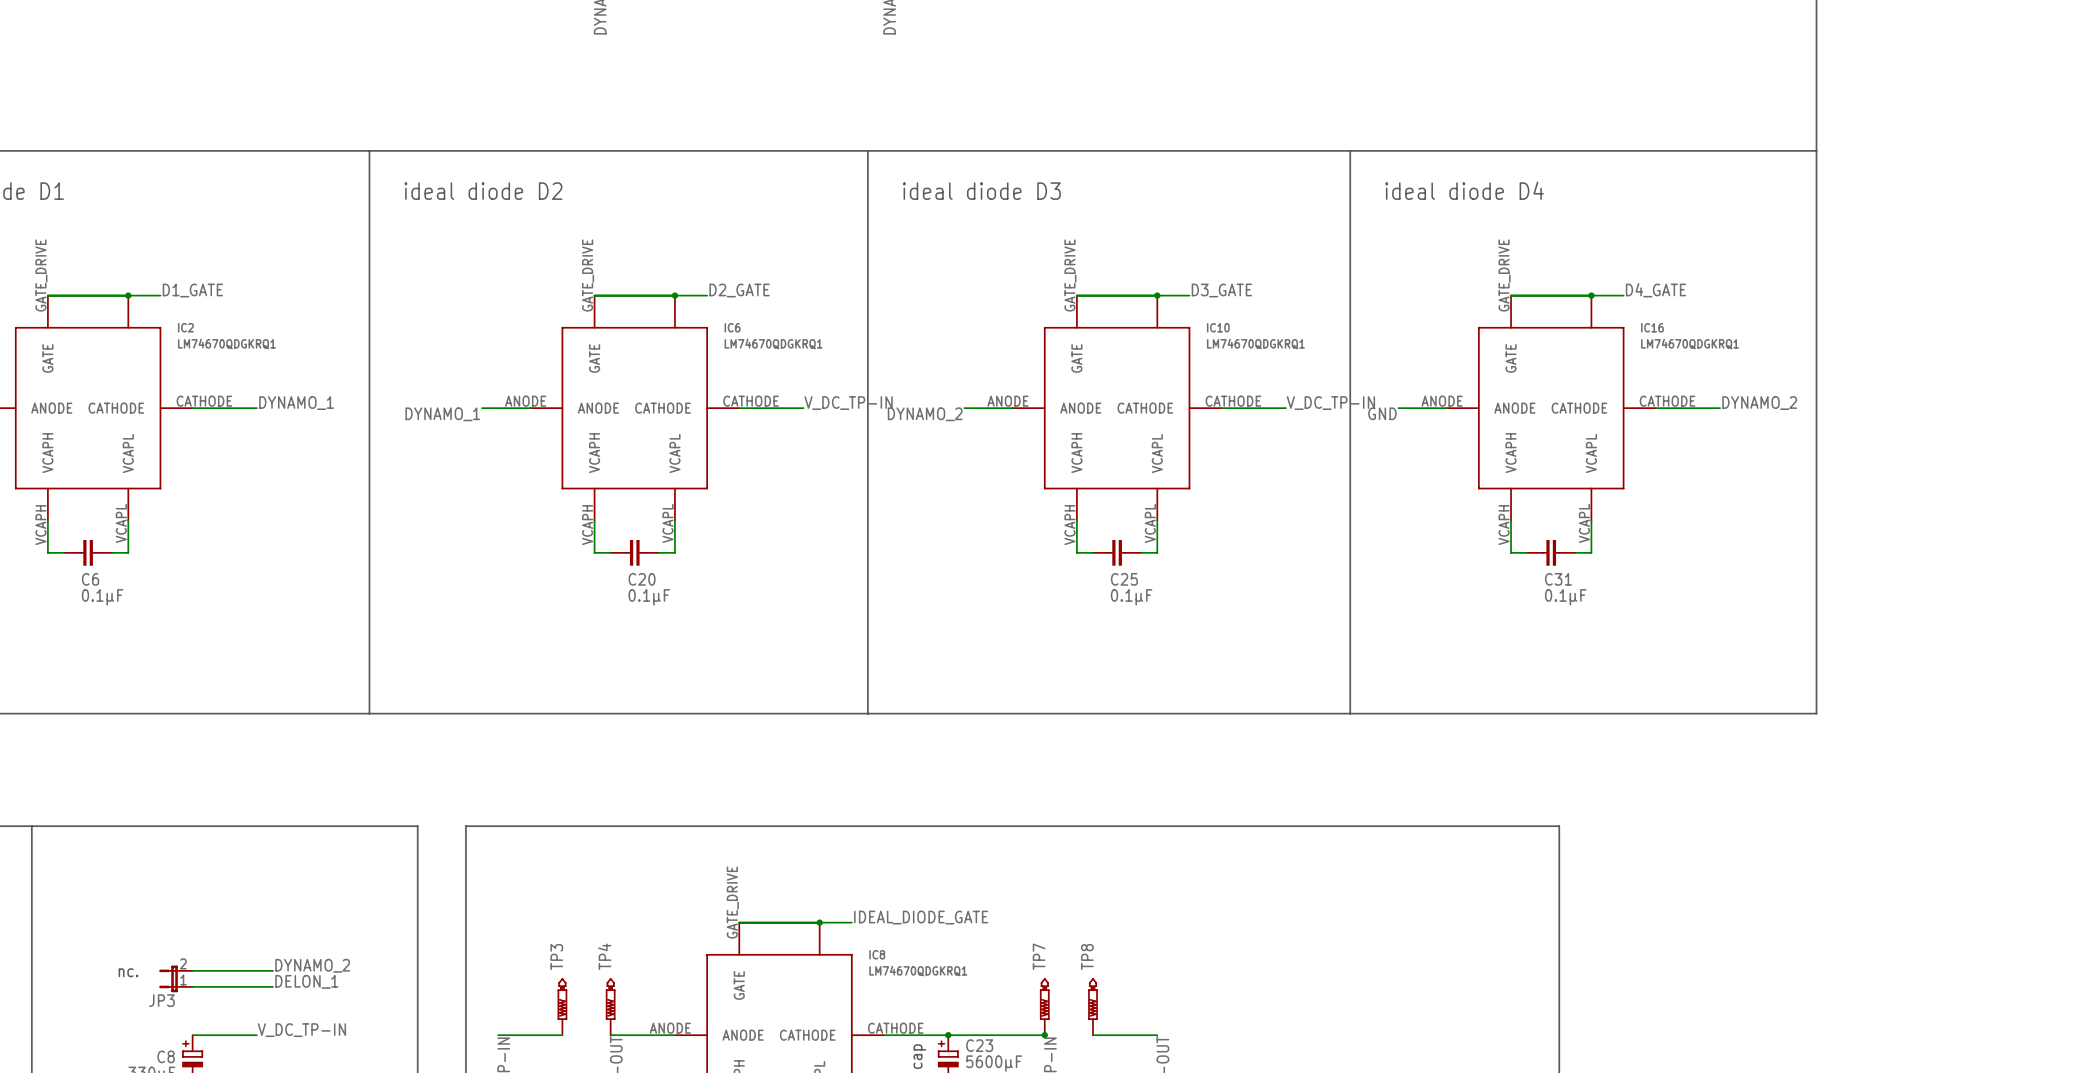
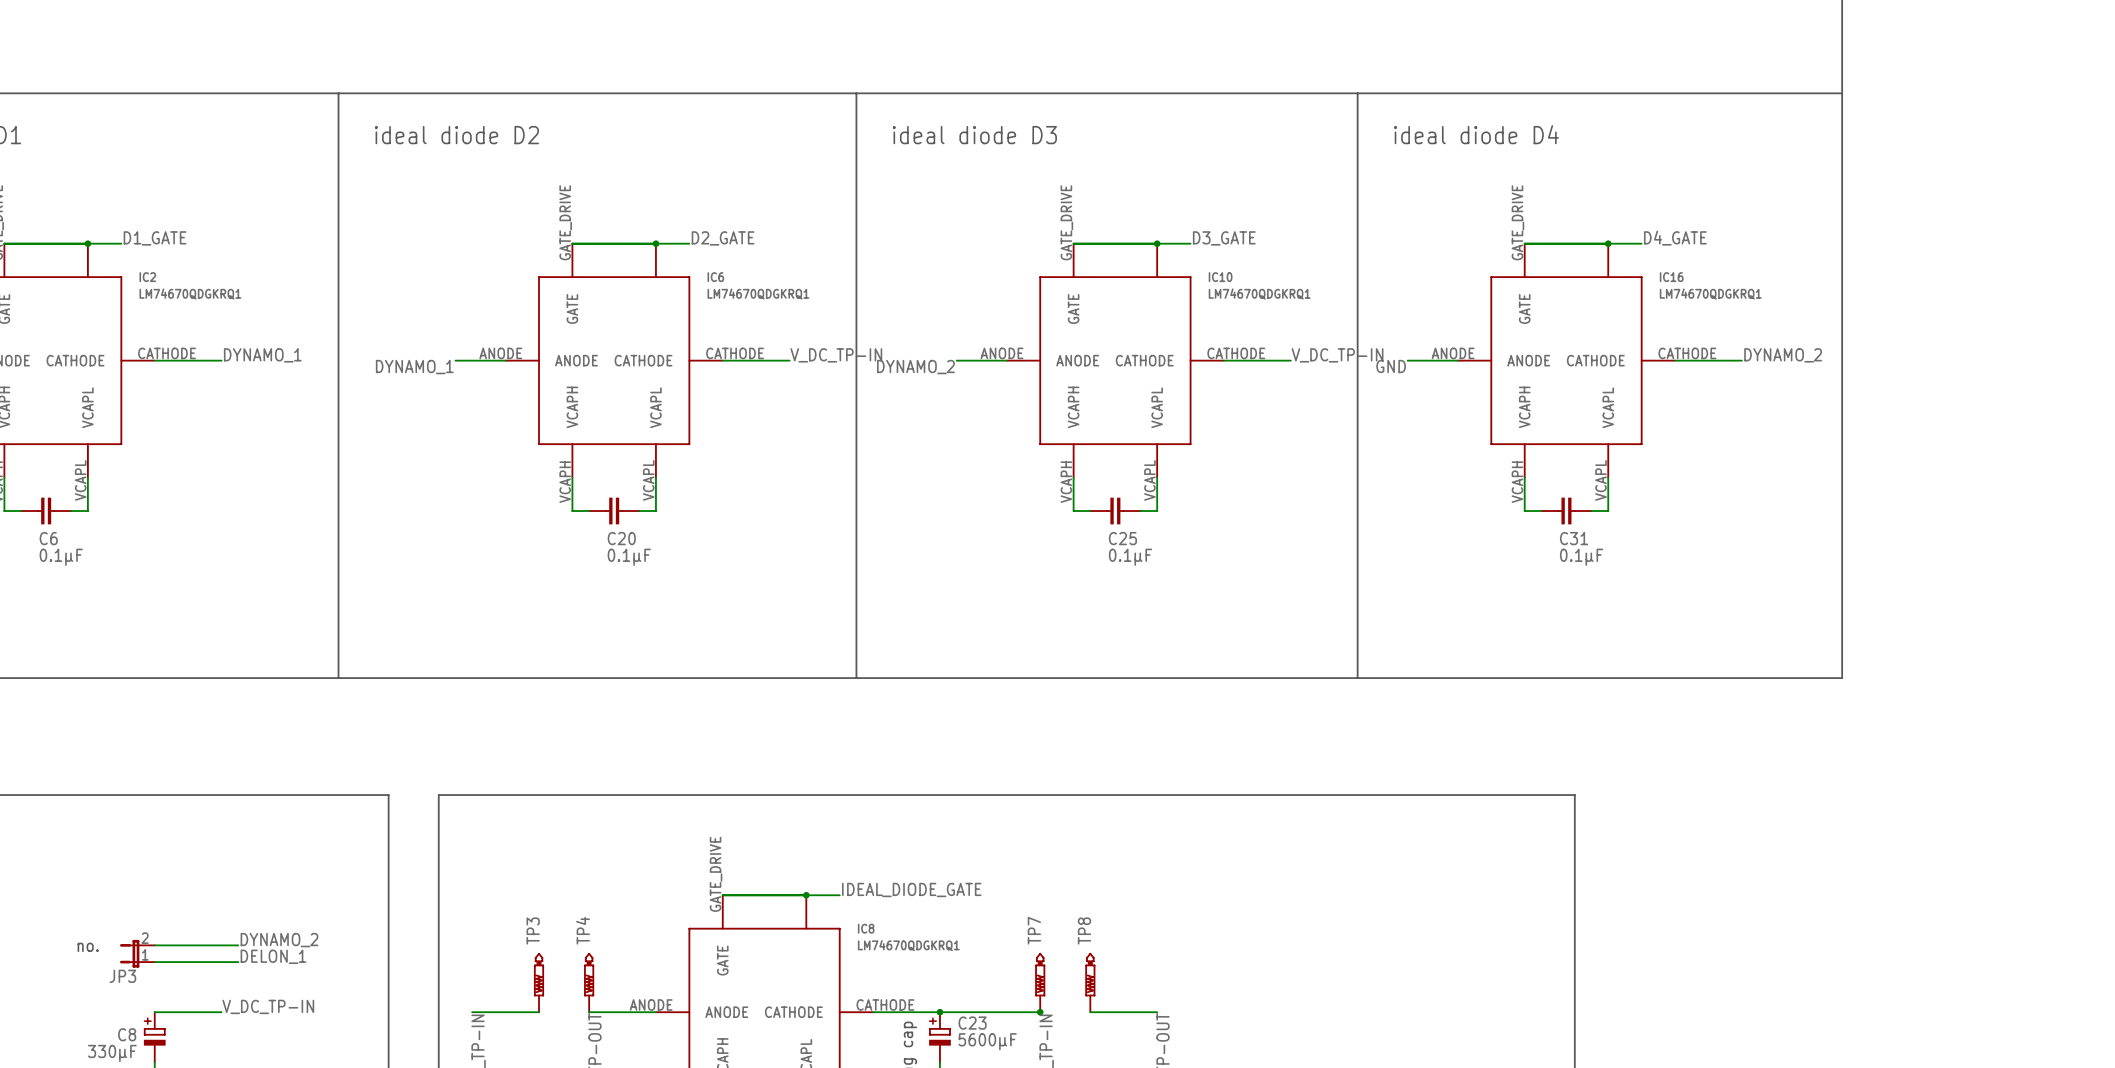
text: nc. (128, 972) -> no. (88, 947)

